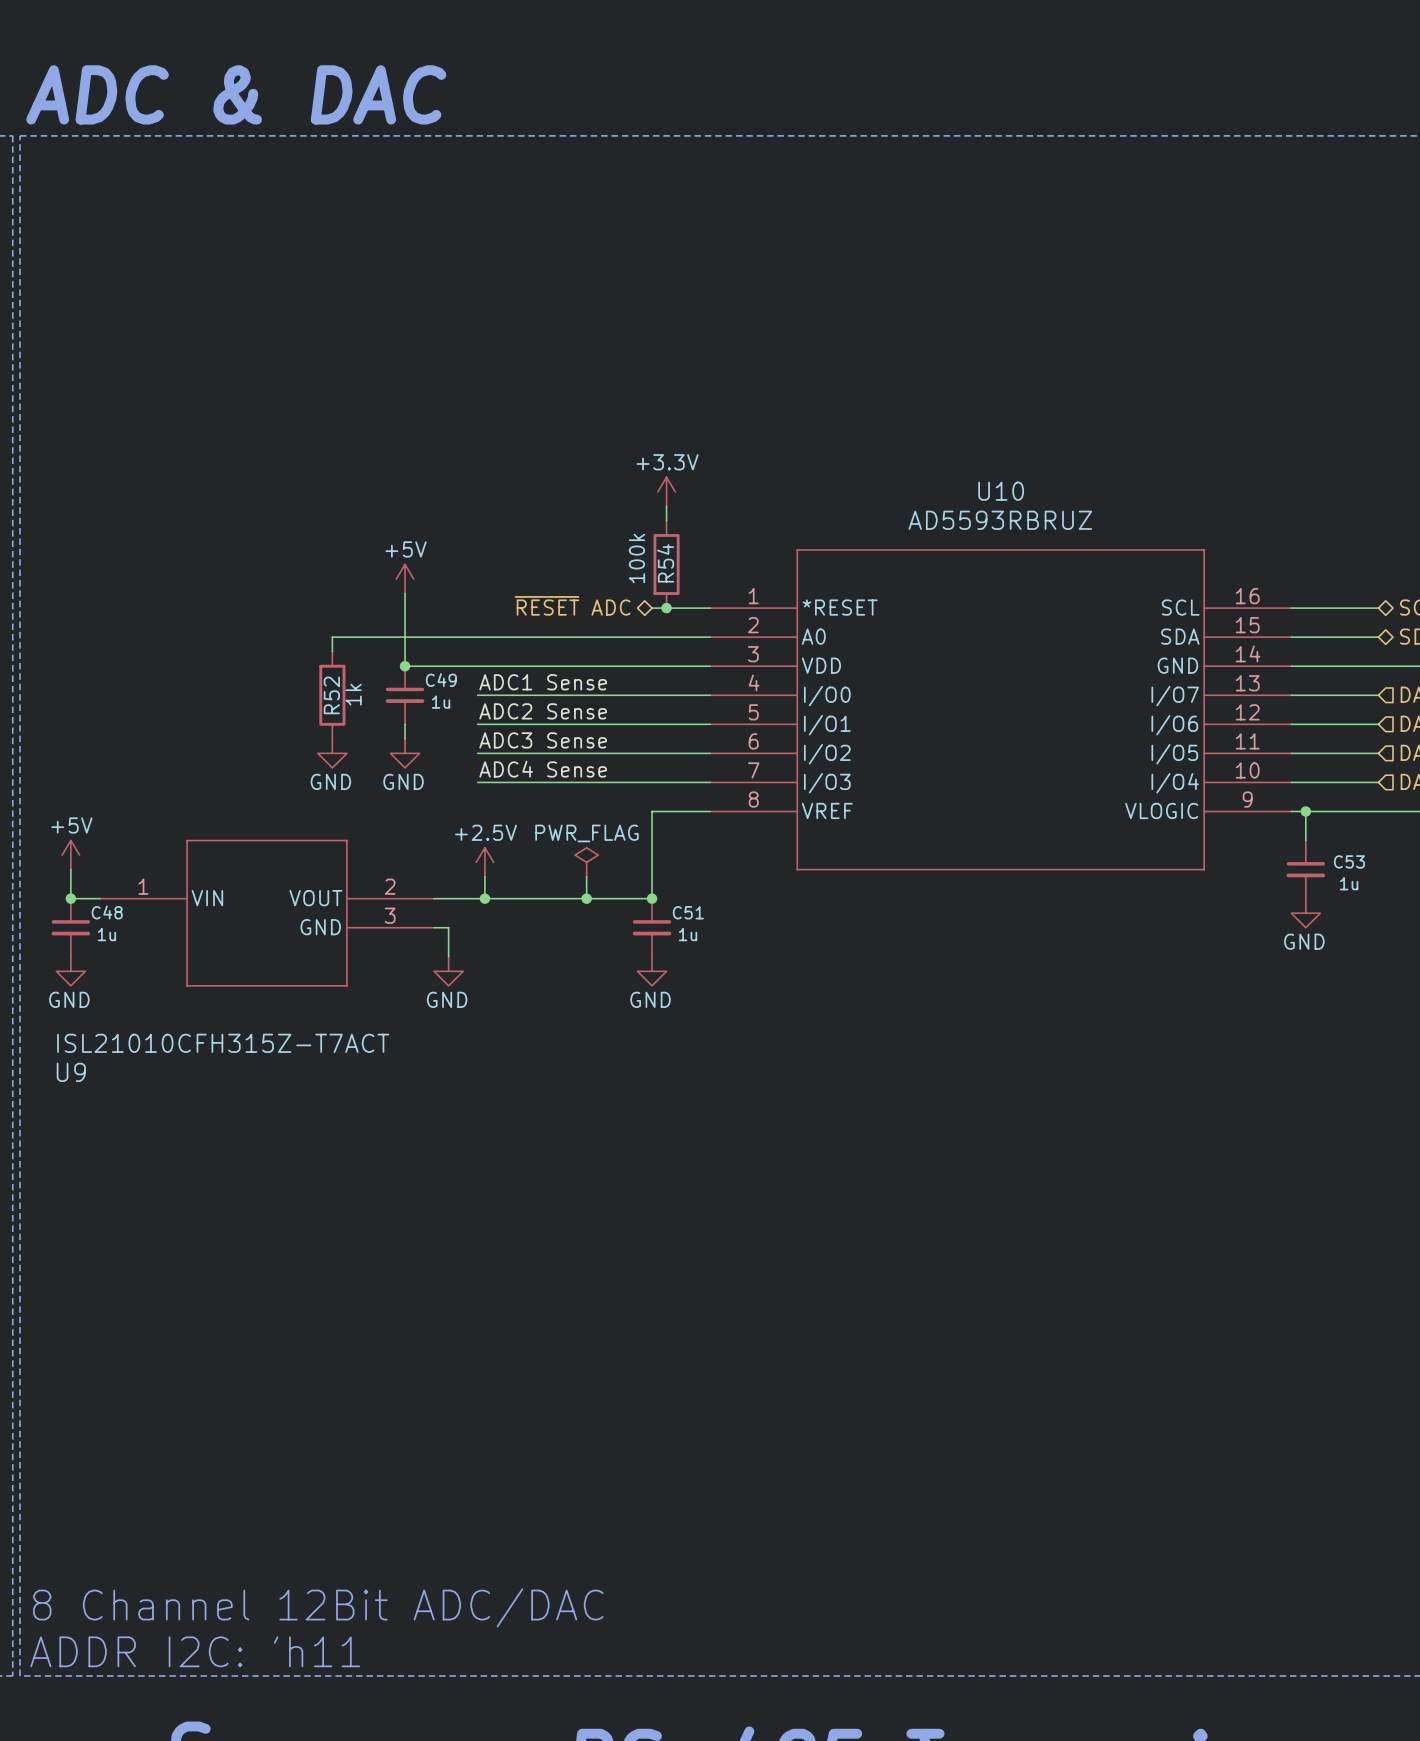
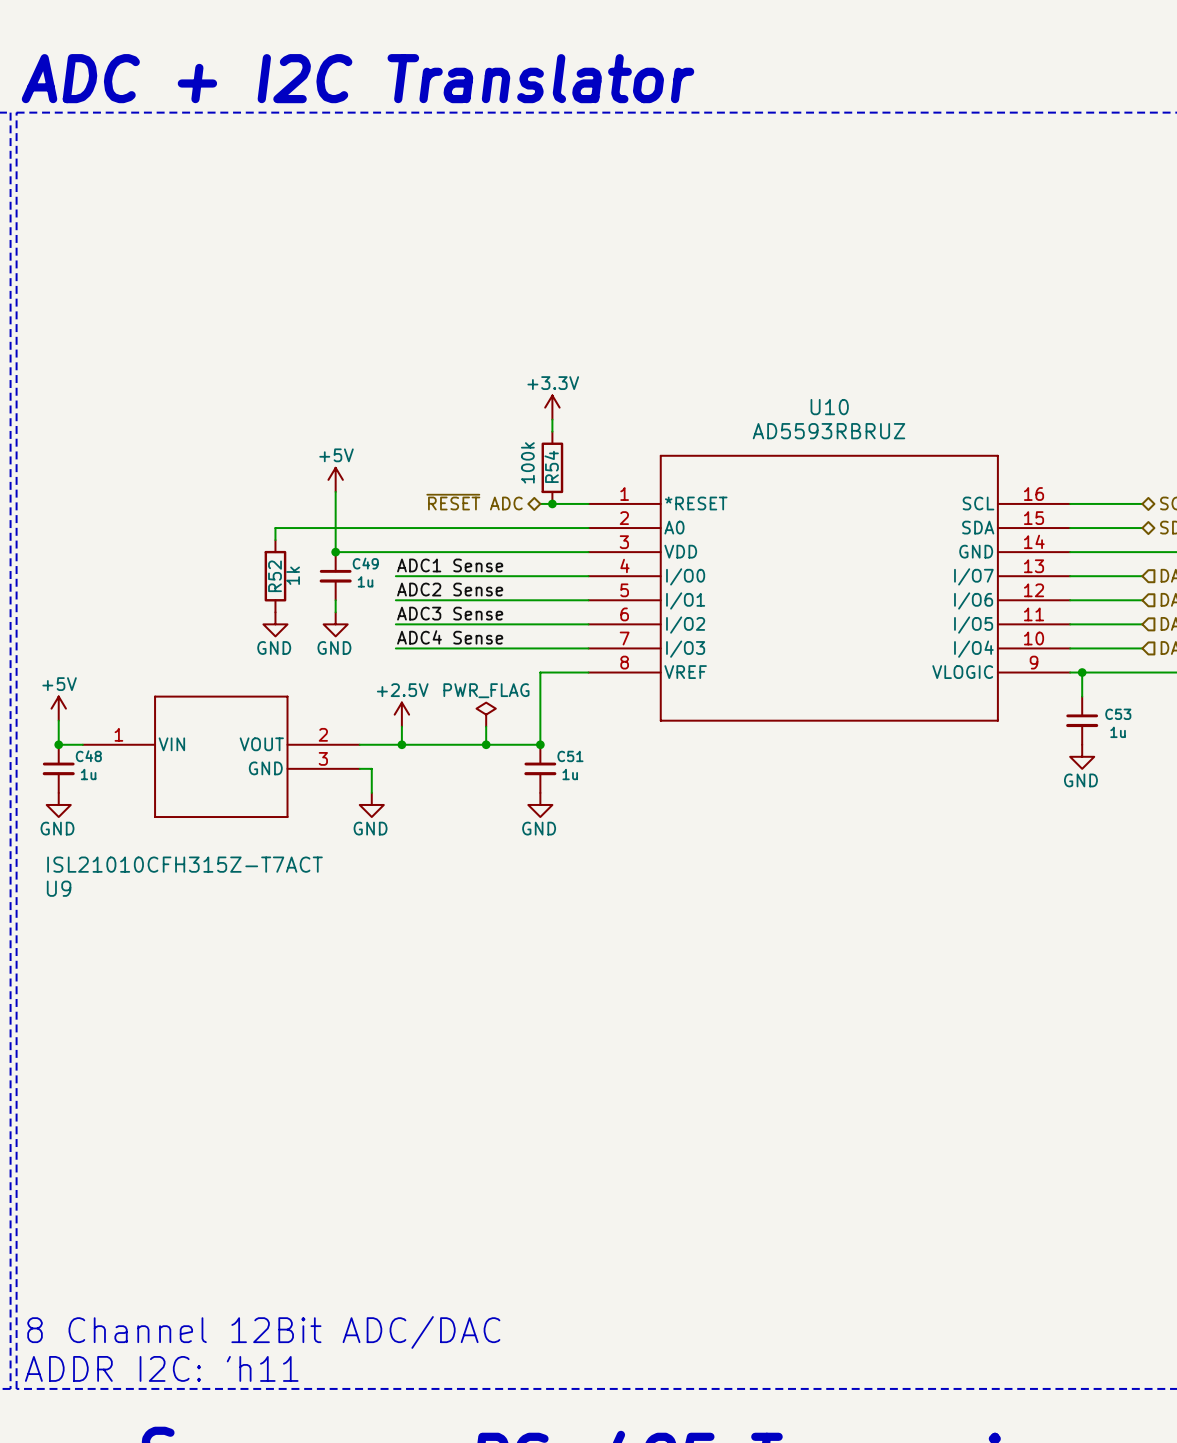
text: ADC & DAC (236, 94) -> ADC + I2C Translator (358, 78)

